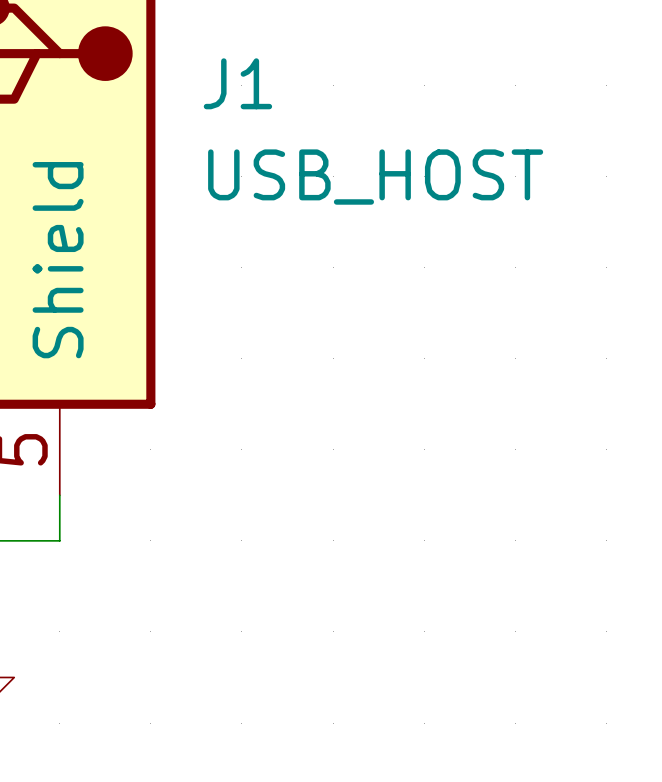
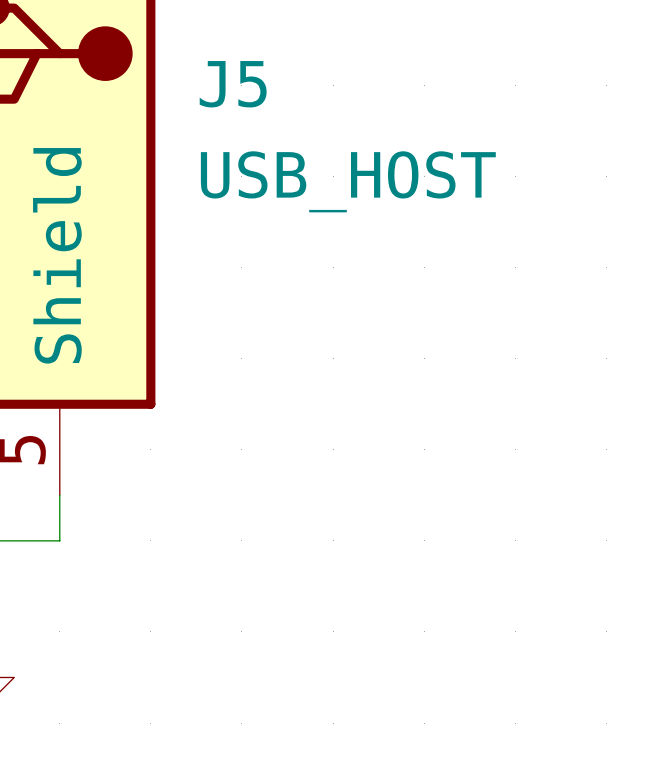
J1 name: J1 (237, 83) -> J5 (233, 84)

